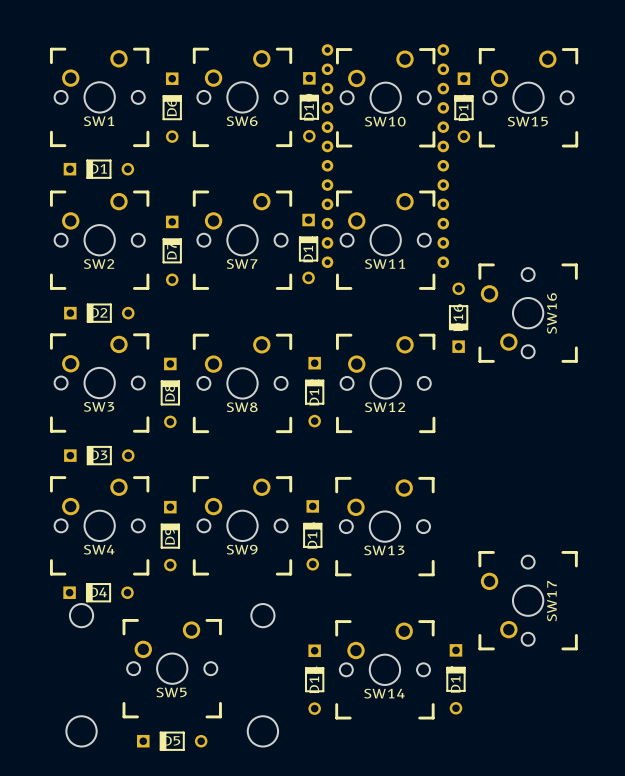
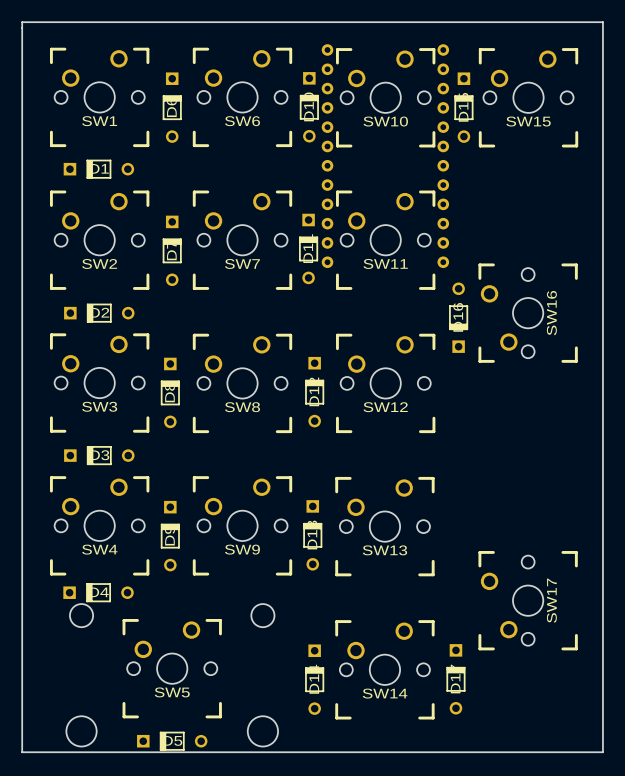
board edge: none -> (22, 22) (22, 752) (602, 752) (602, 22) (22, 22)

